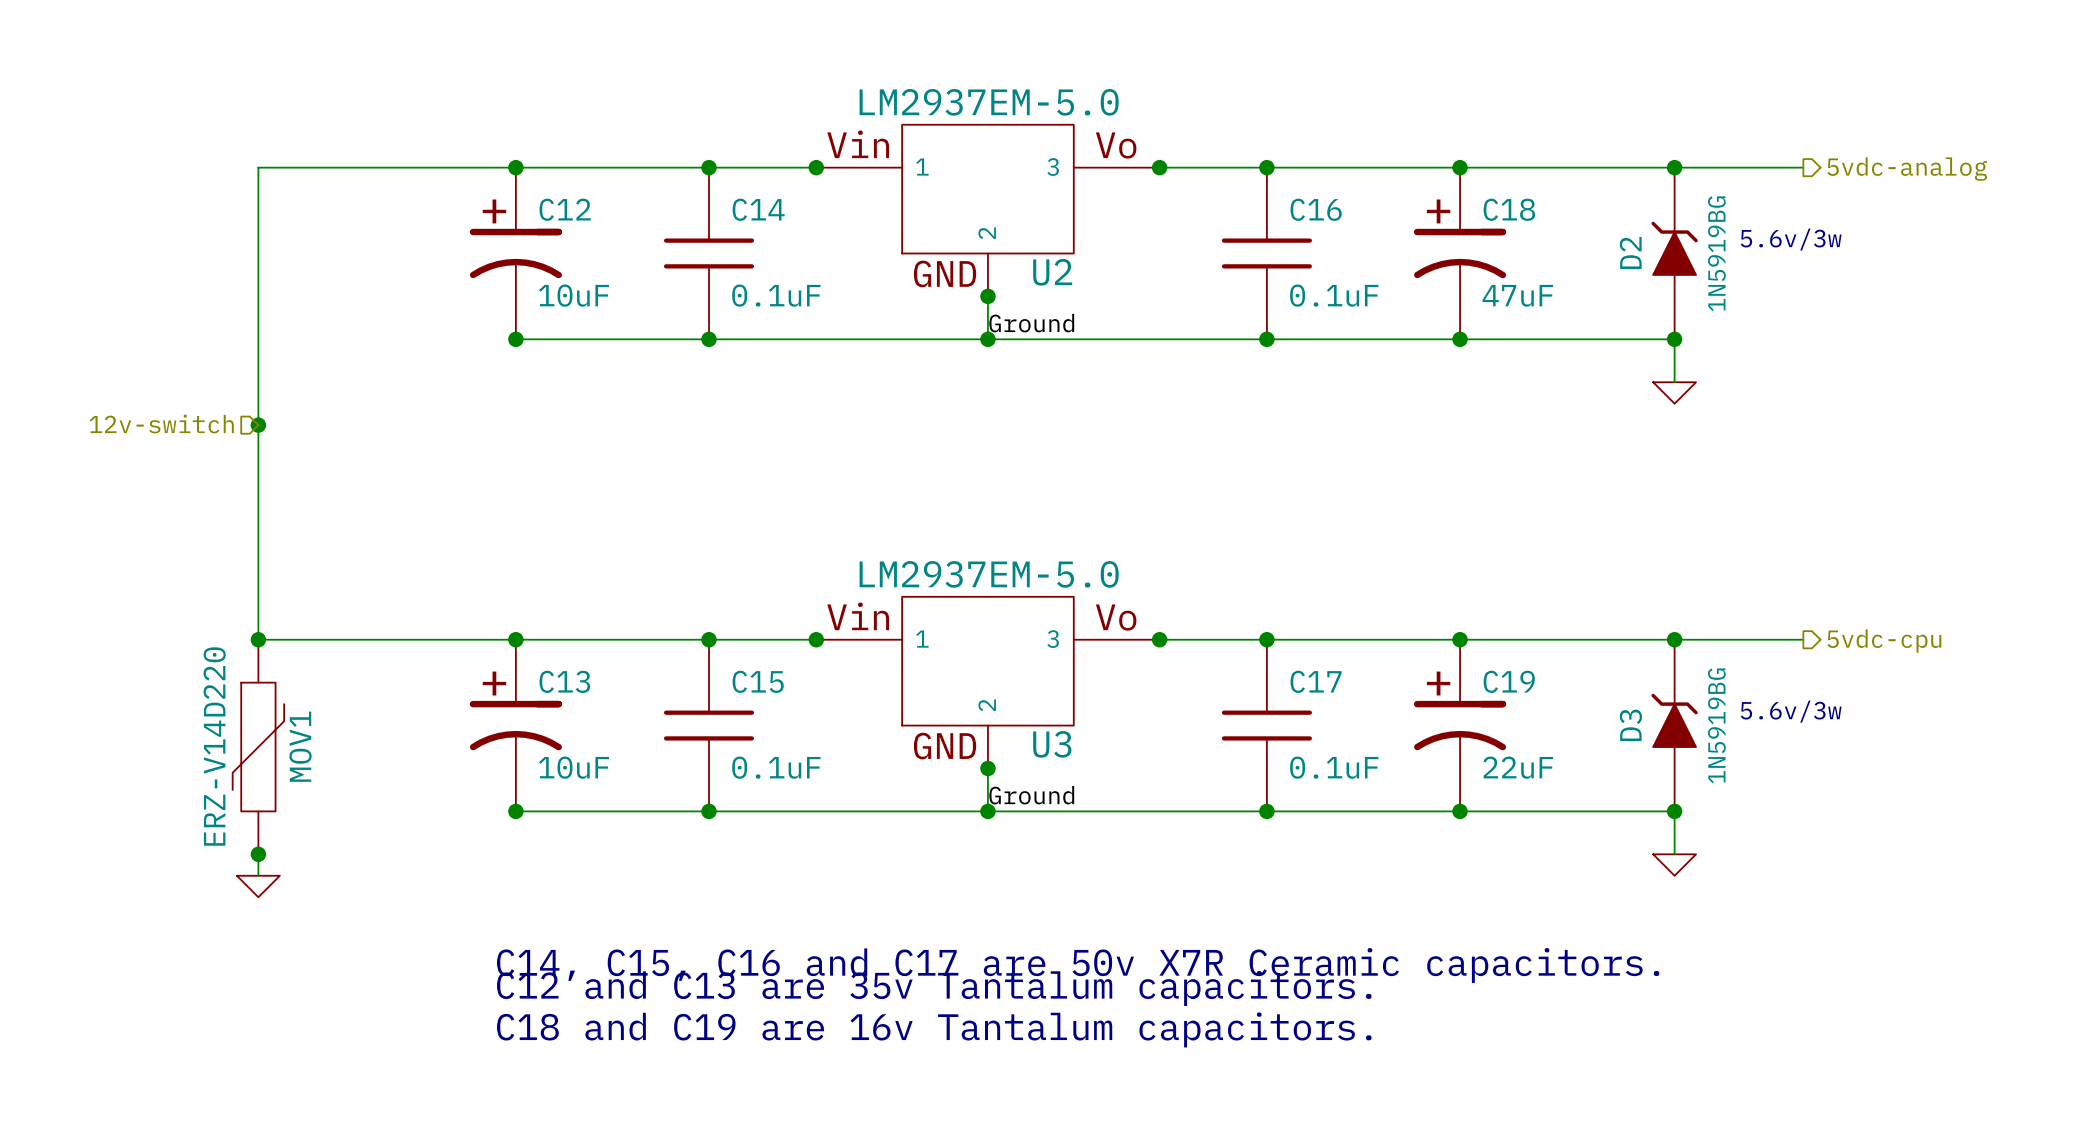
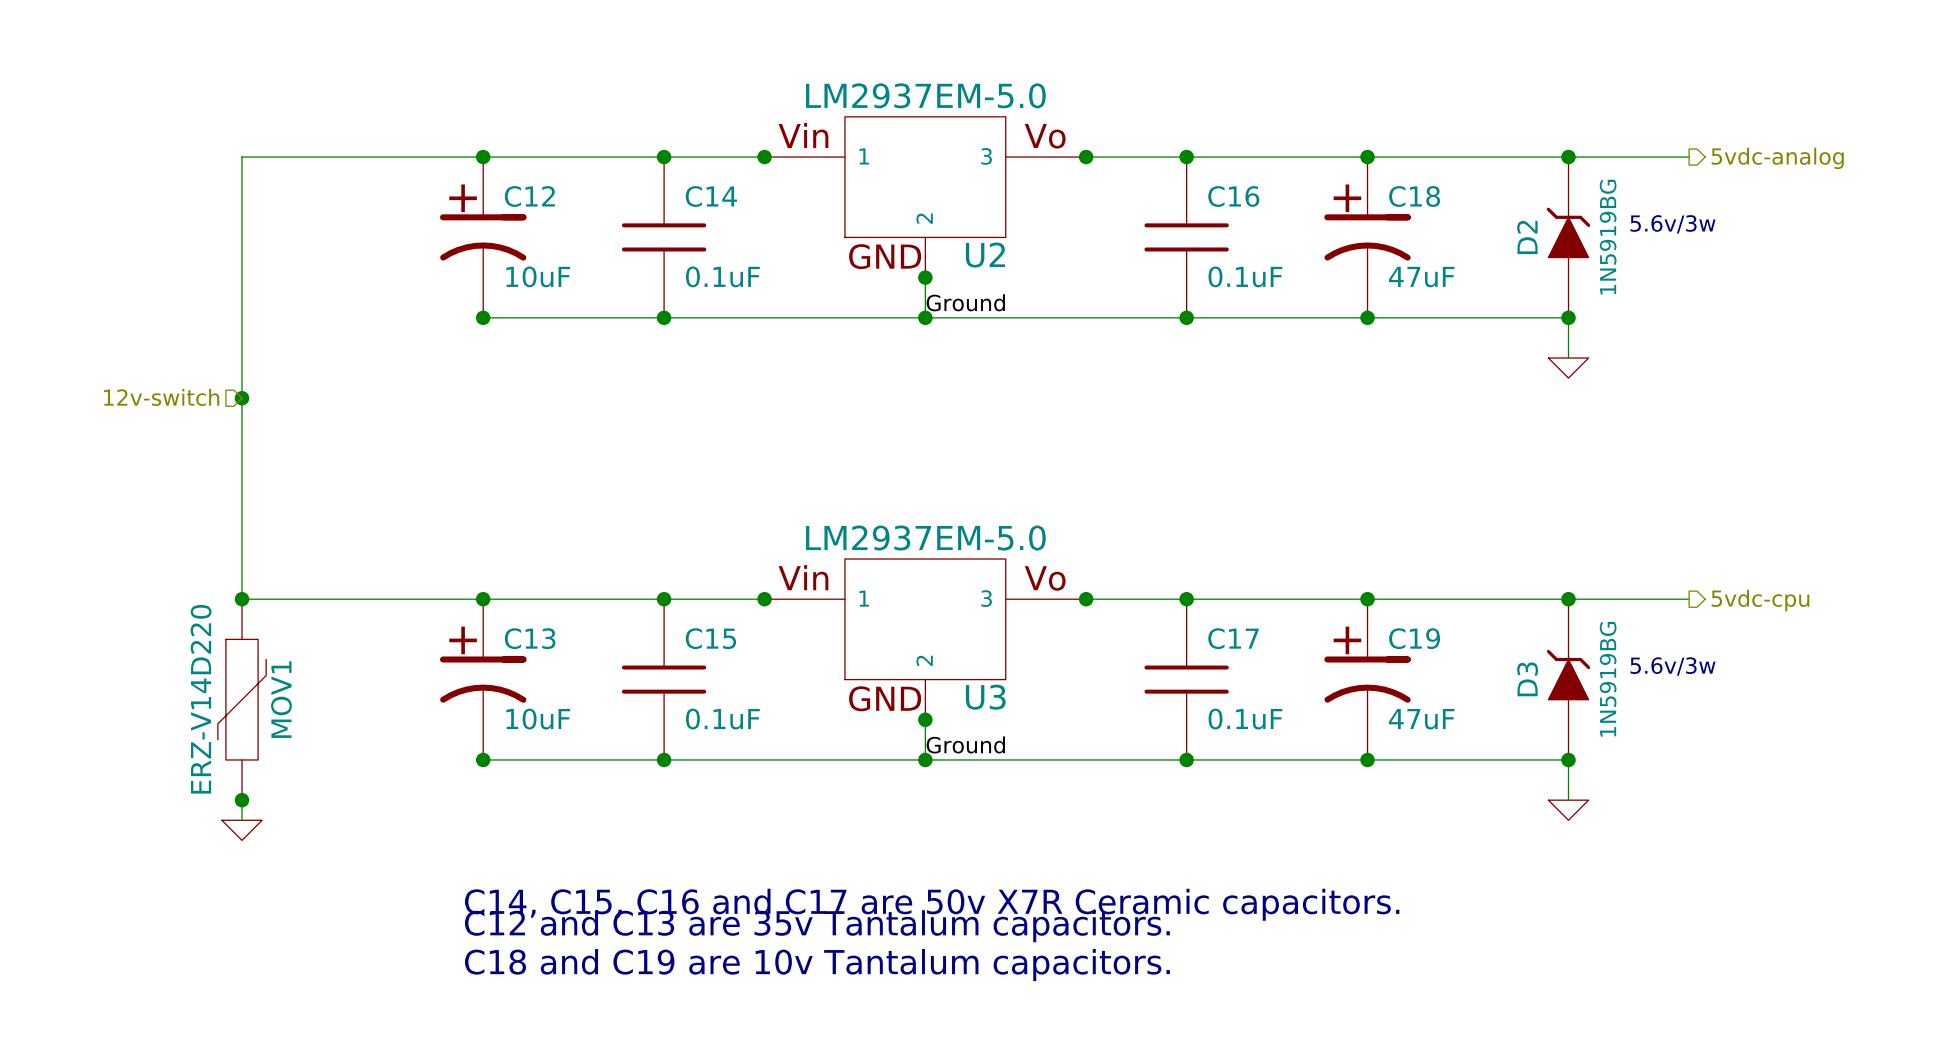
C19 value: 22uF (1518, 767) -> 47uF (1421, 719)
text: C18 and C19 are 16v Tantalum capacitors. (934, 1029) -> C18 and C19 are 10v Tantalum capacitors. (817, 965)

